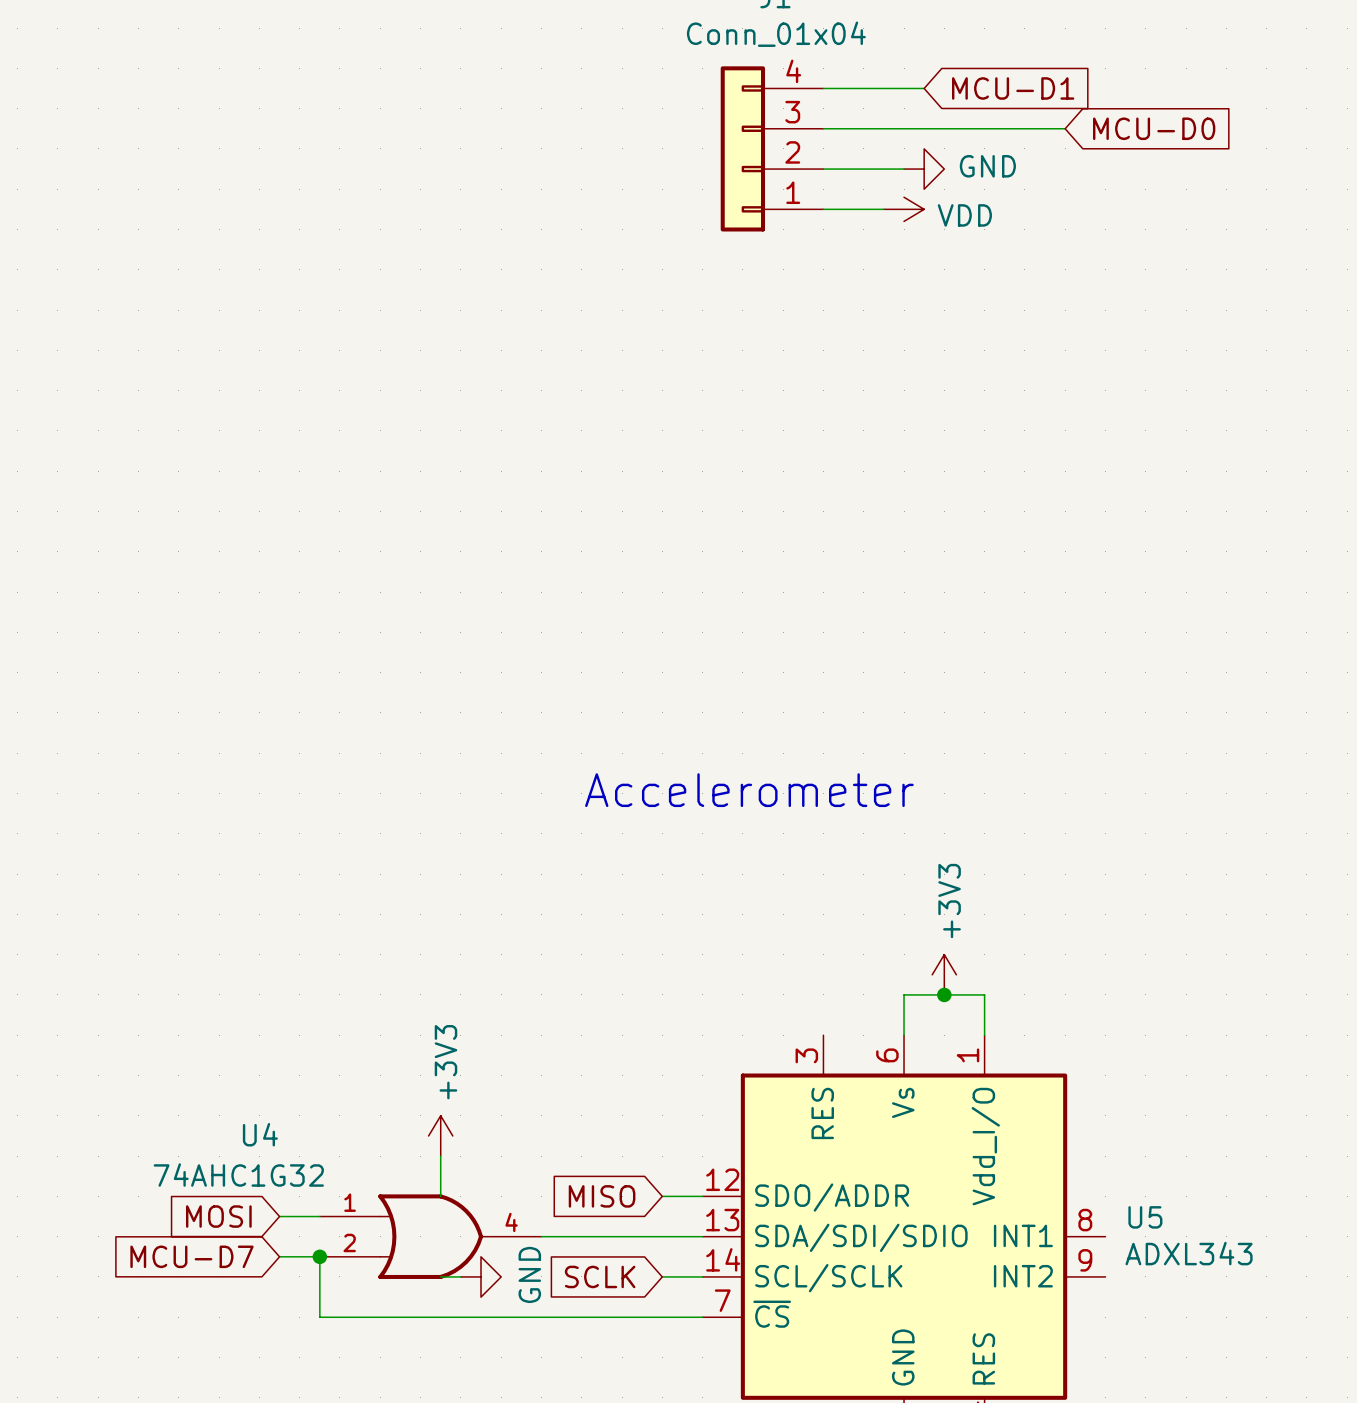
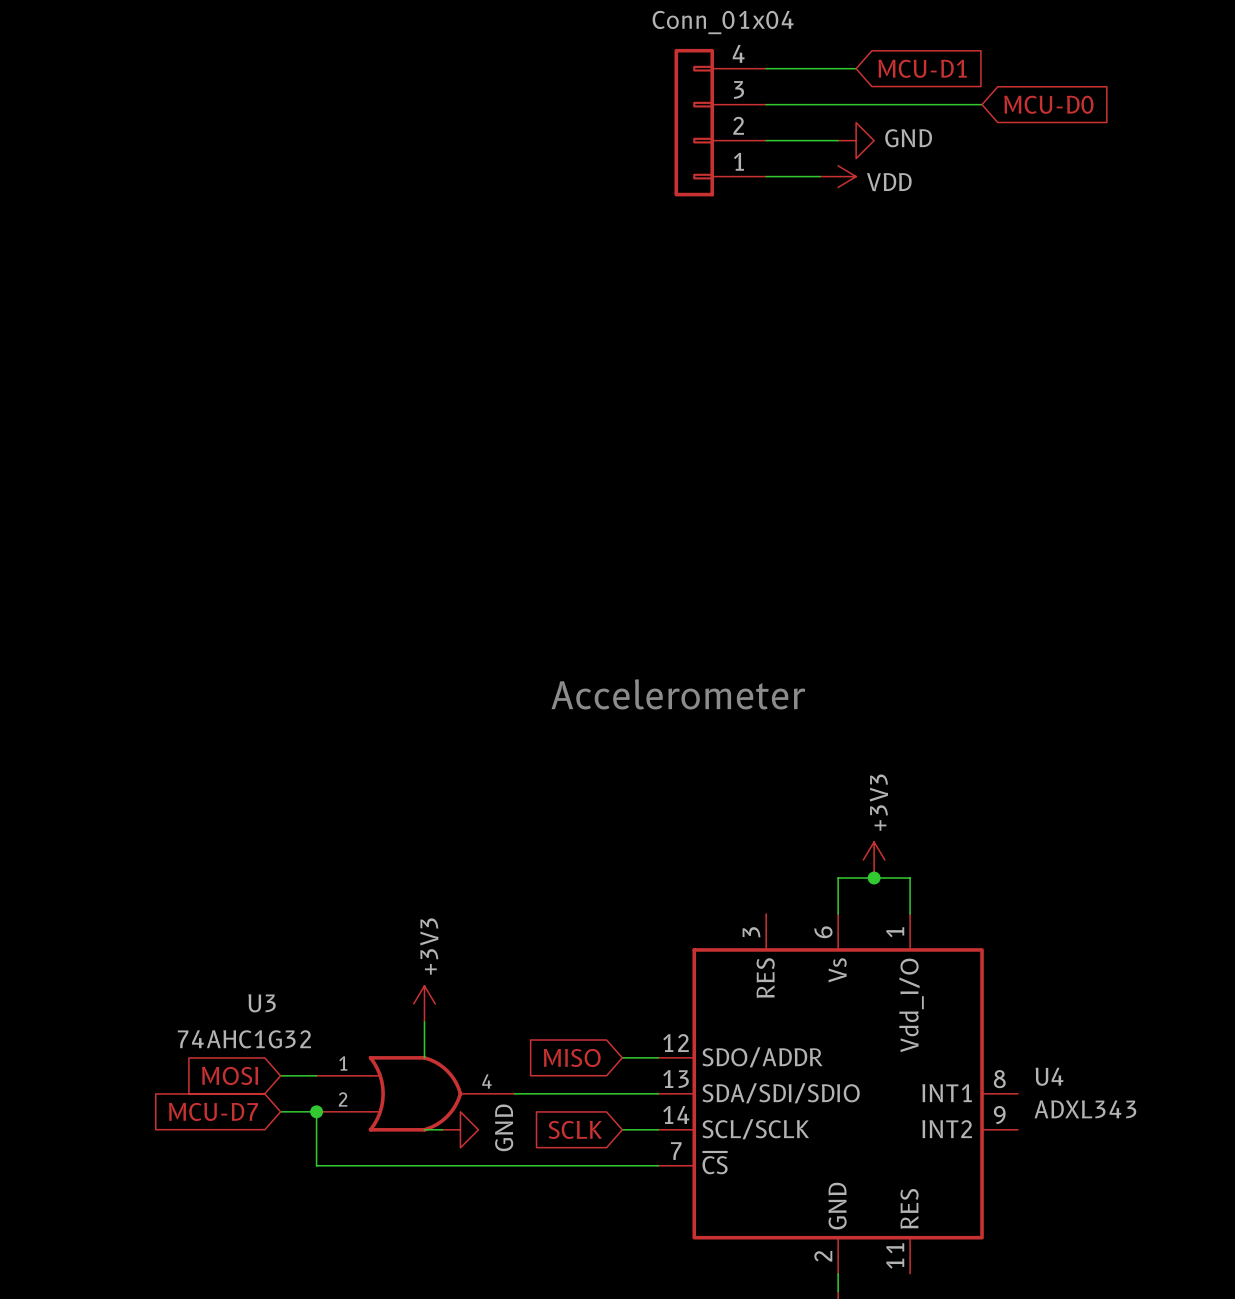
U4 name: U4 (260, 1134) -> U3 (262, 1003)
U5 name: U5 (1145, 1217) -> U4 (1049, 1076)

